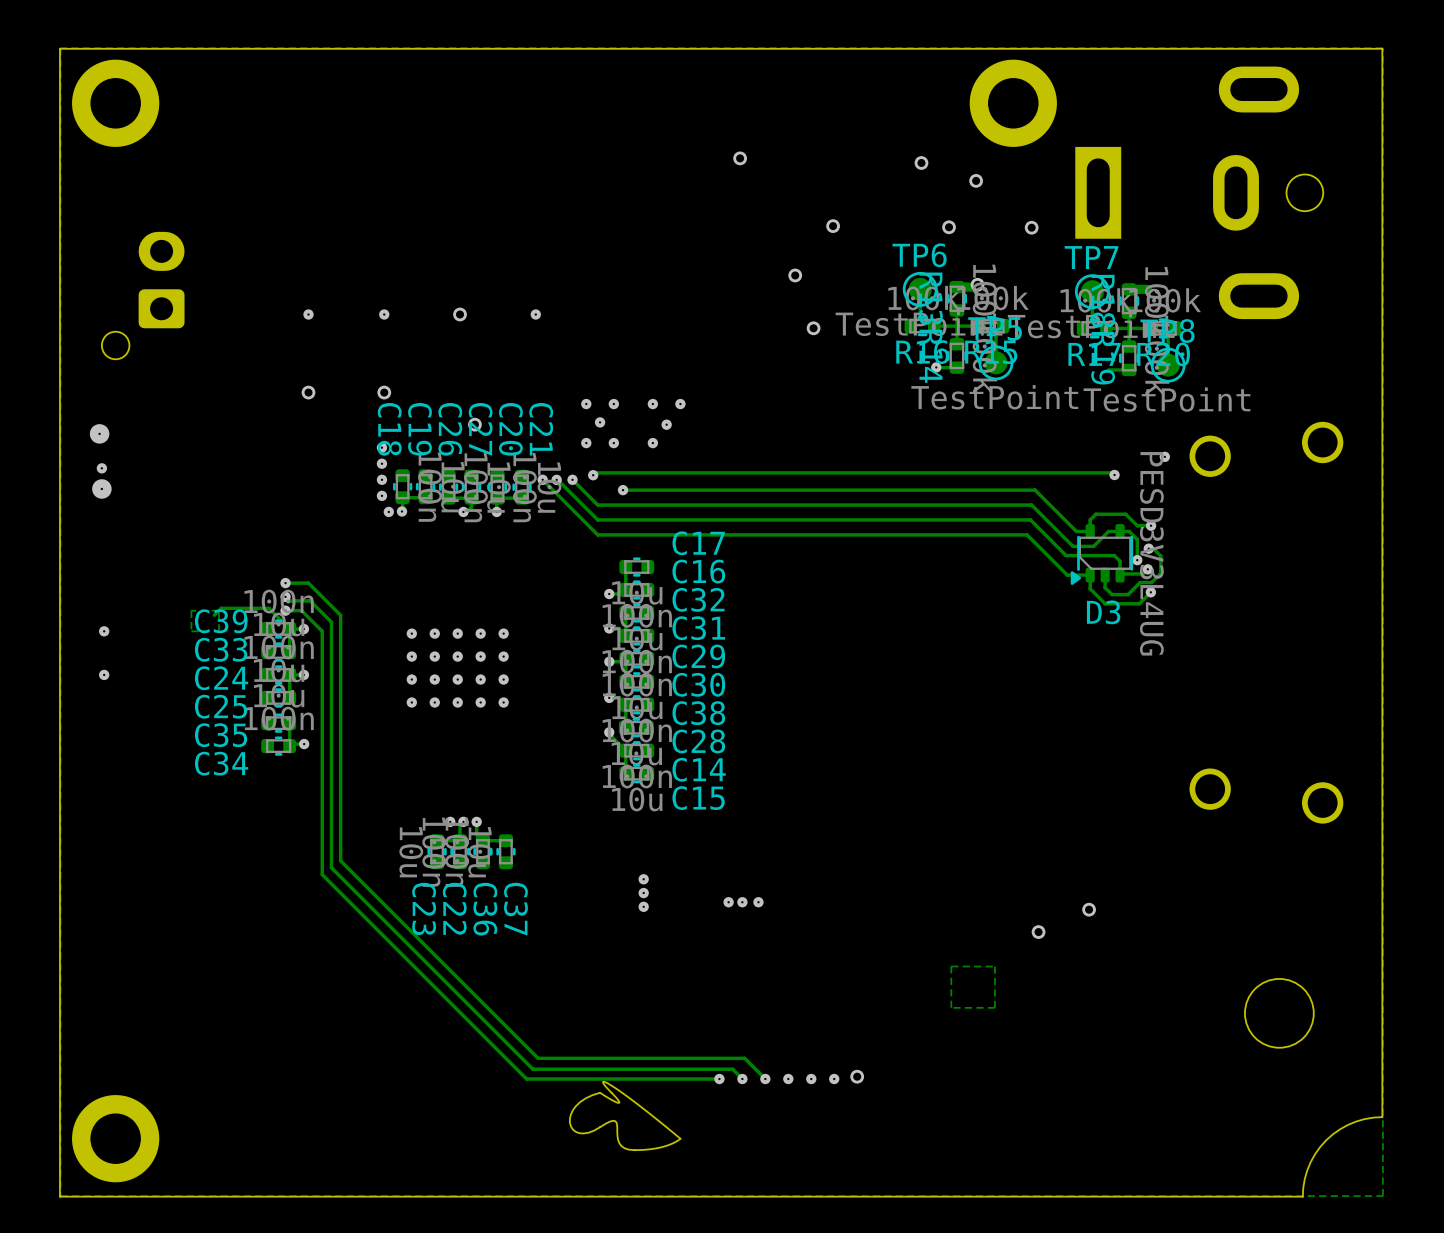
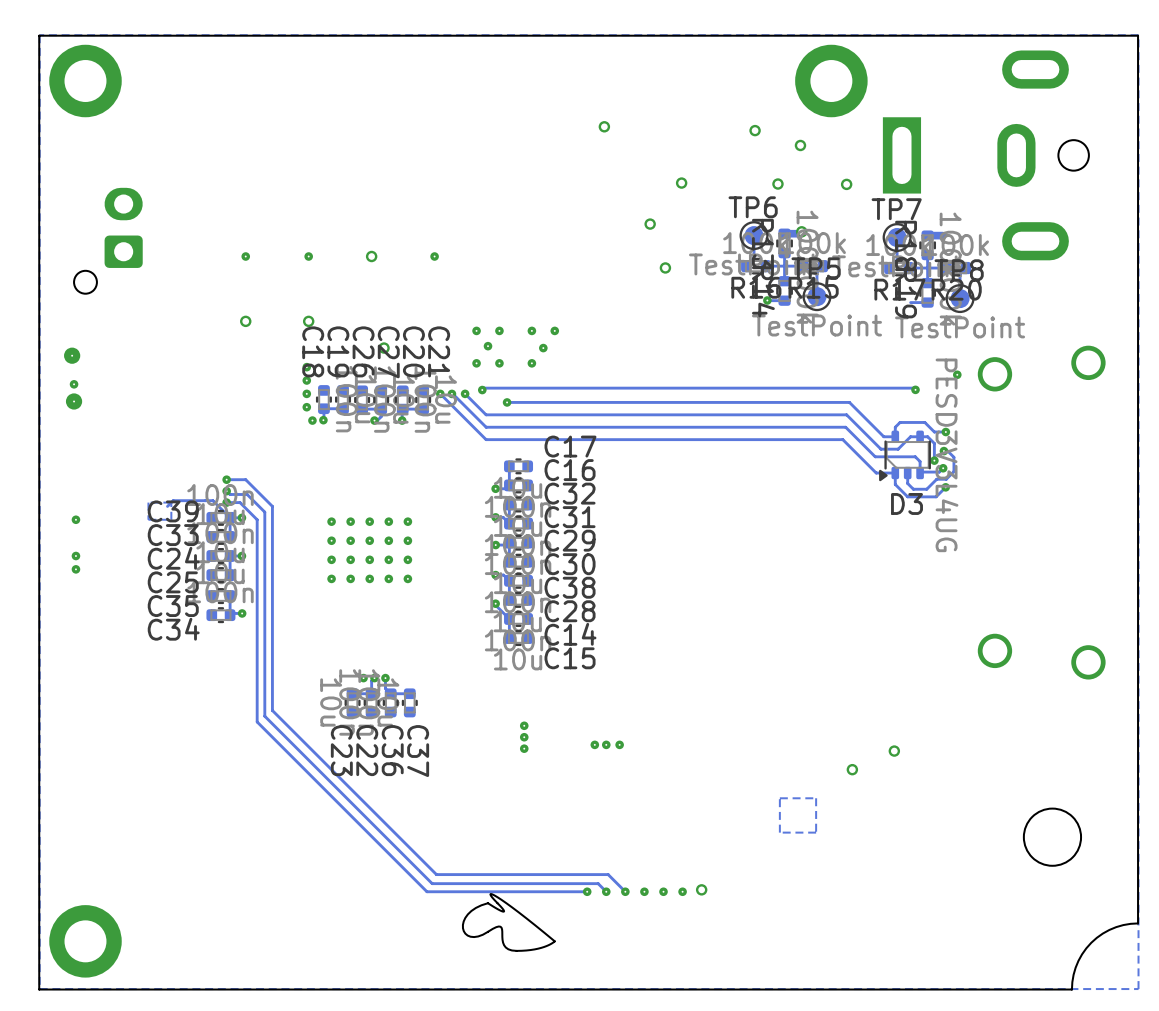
via: none -> (75, 569)

